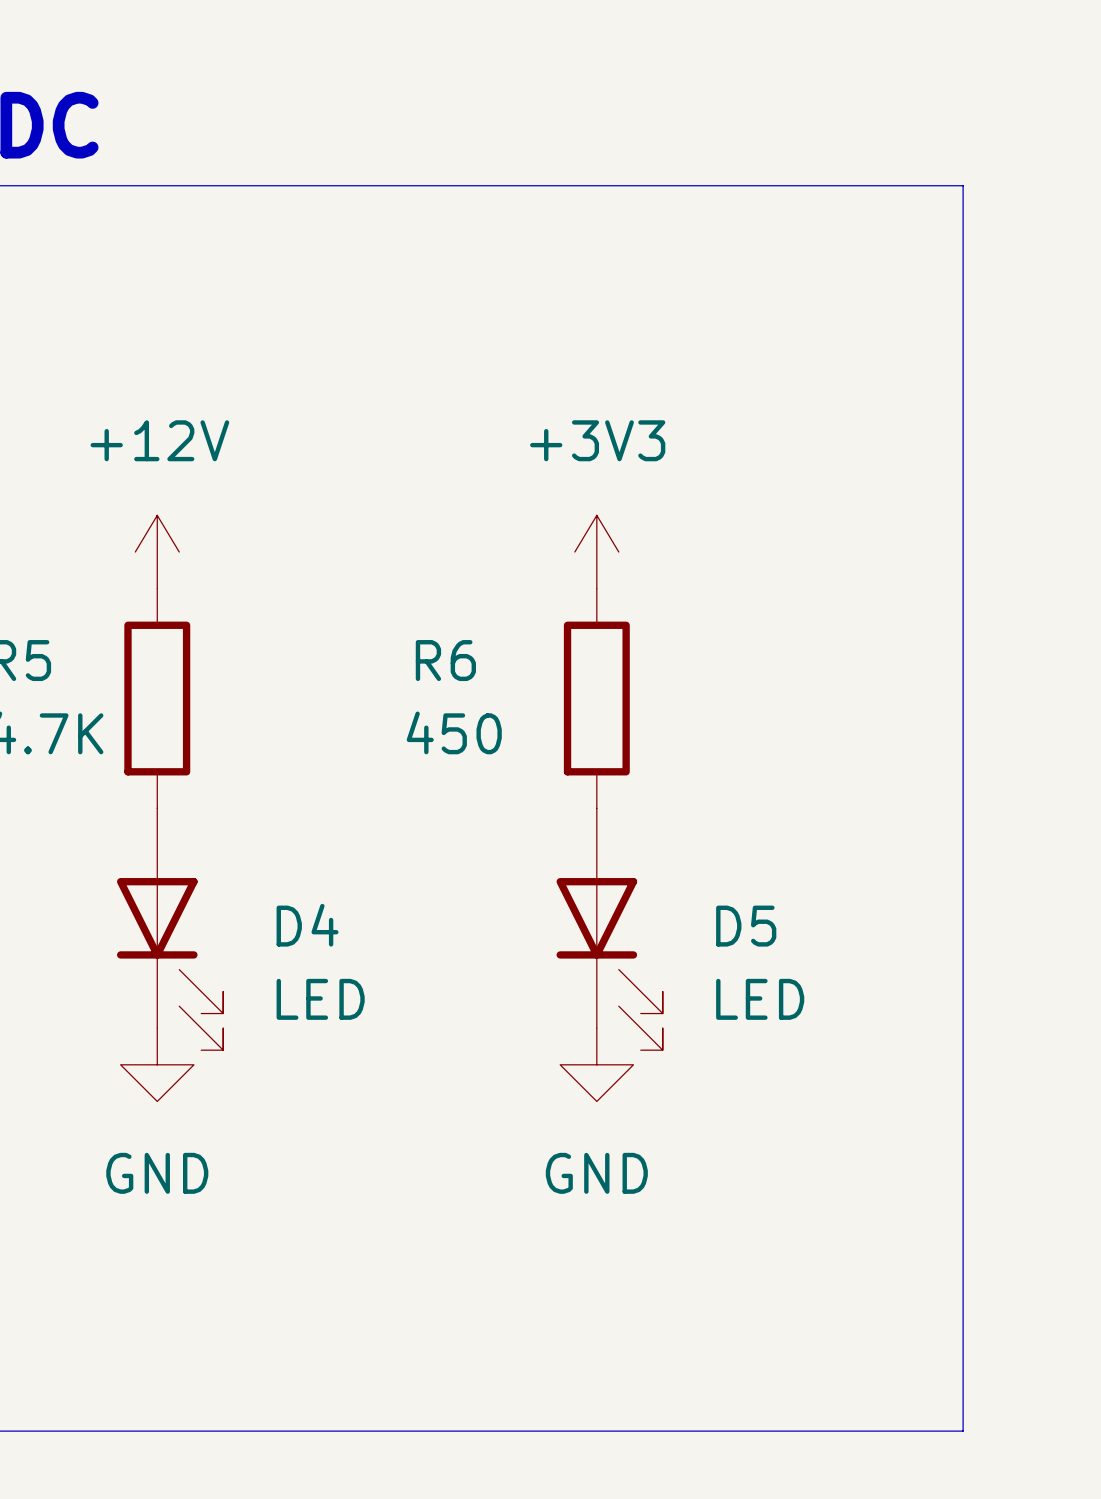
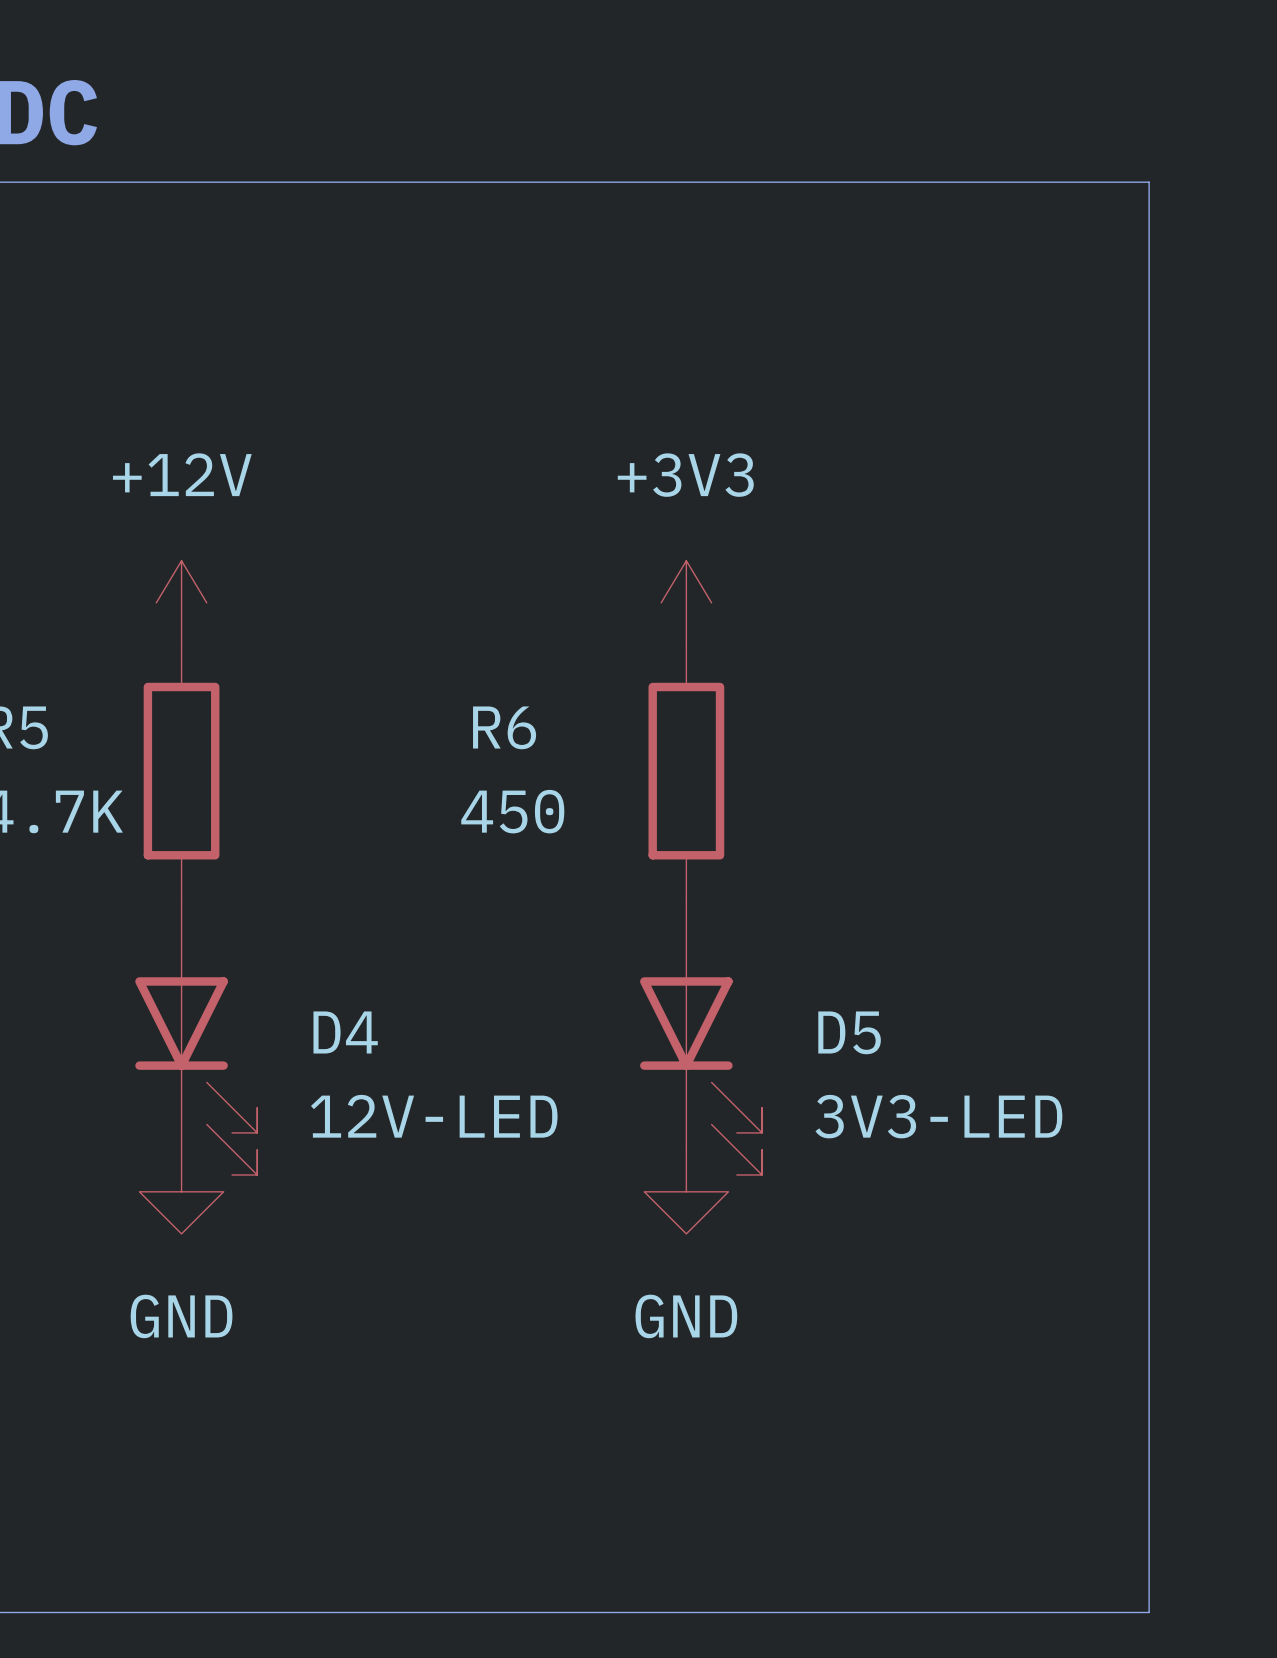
line: (963, 185) (963, 1431) -> (1107, 182) (1149, 182) (1149, 1612) (1107, 1612)
D4 value: LED (320, 999) -> 12V-LED (434, 1116)
D5 value: LED (760, 999) -> 3V3-LED (938, 1116)

